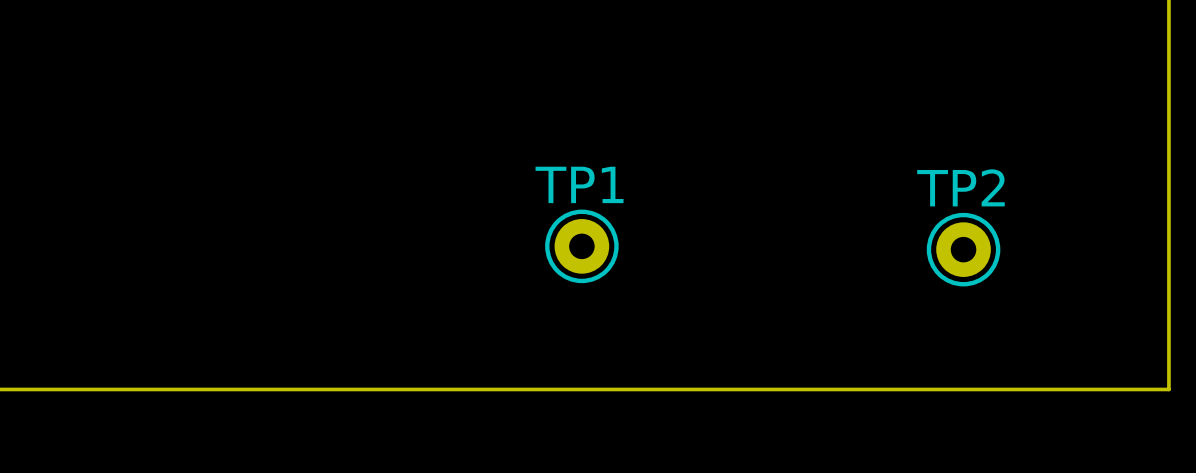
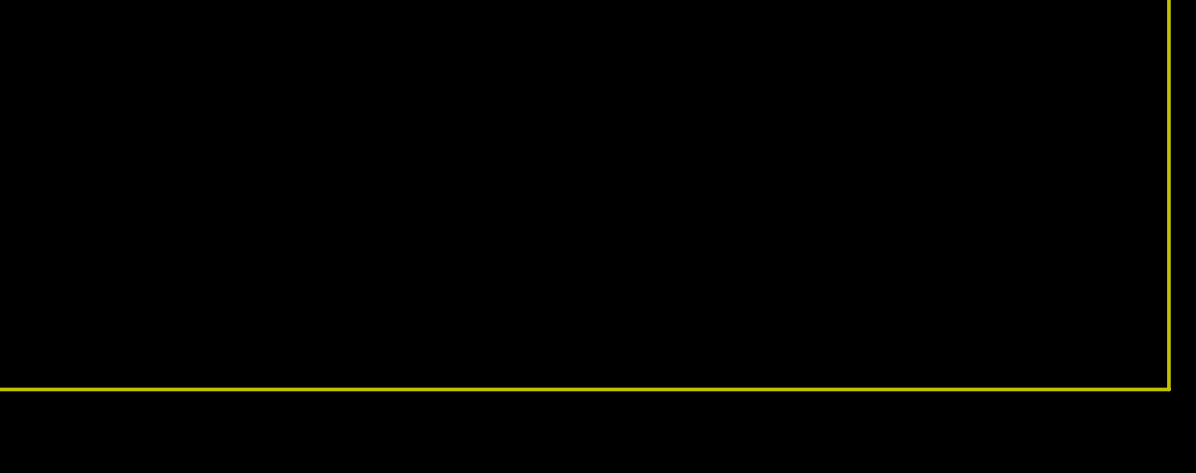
part: (581, 246) -> none
part: (963, 249) -> none

